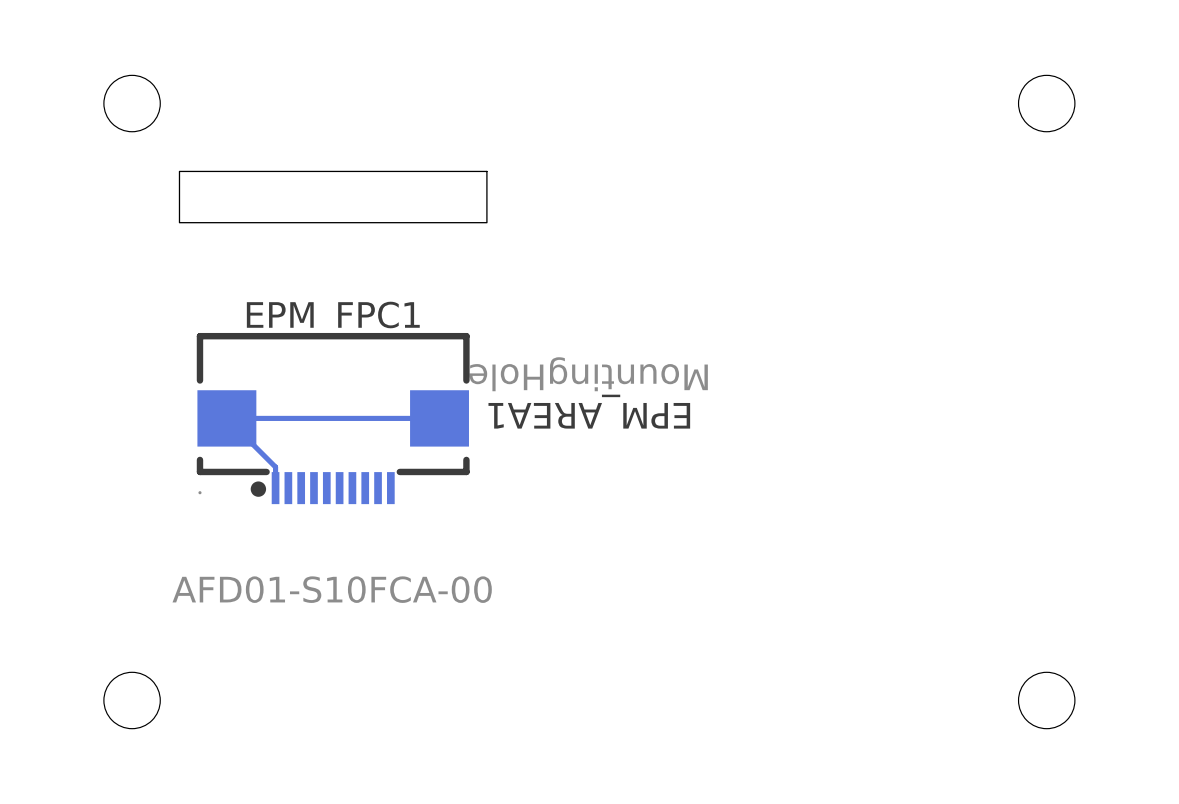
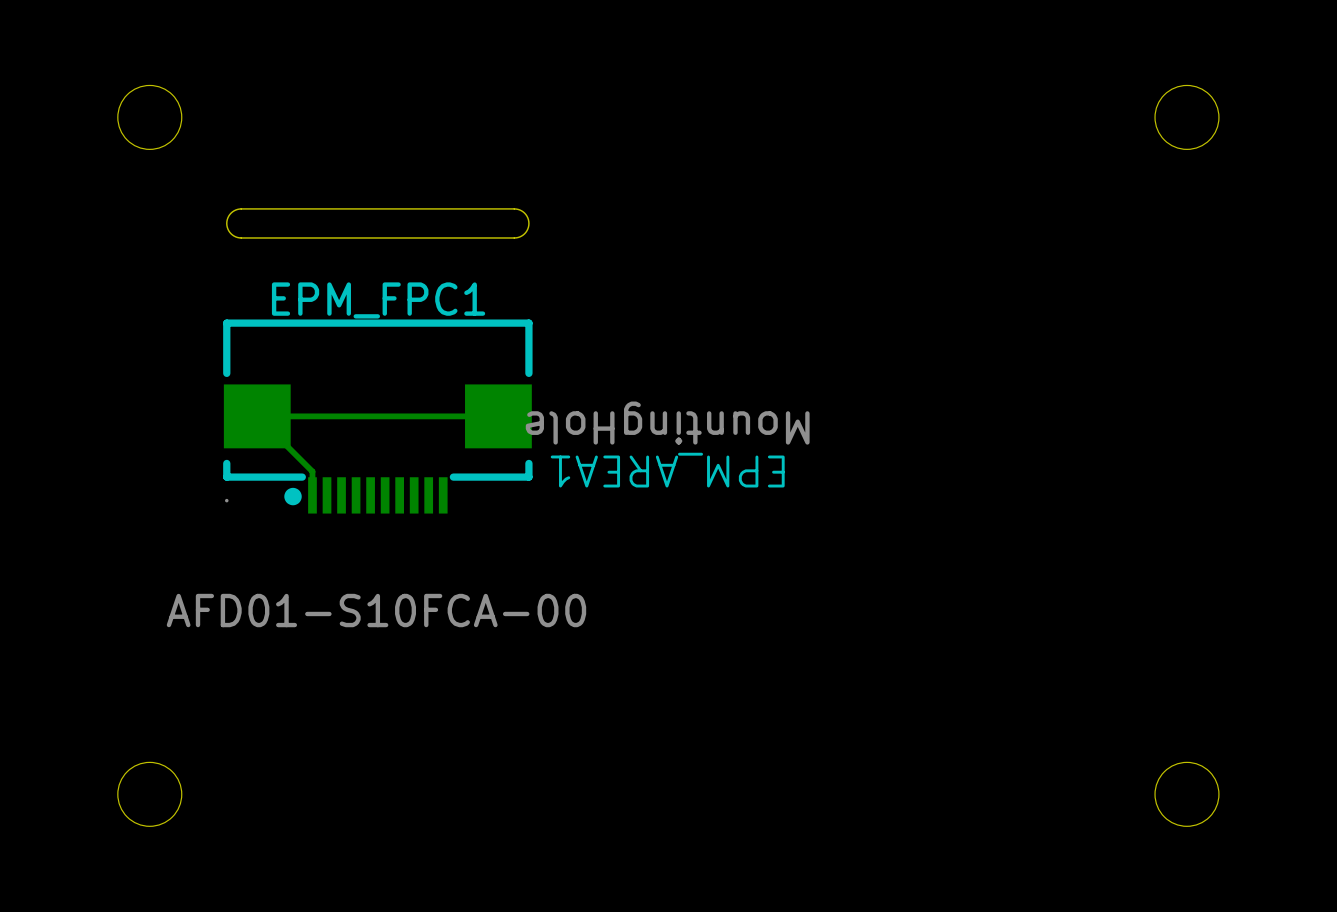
drawing shape: [178, 170, 488, 224] -> [226, 208, 530, 239]
EPM_FPC1 position: (333, 418) -> (377, 416)
bottom track: (439, 418) (226, 418) (275, 467) (275, 488) -> (498, 416) (257, 416) (312, 471) (312, 495)

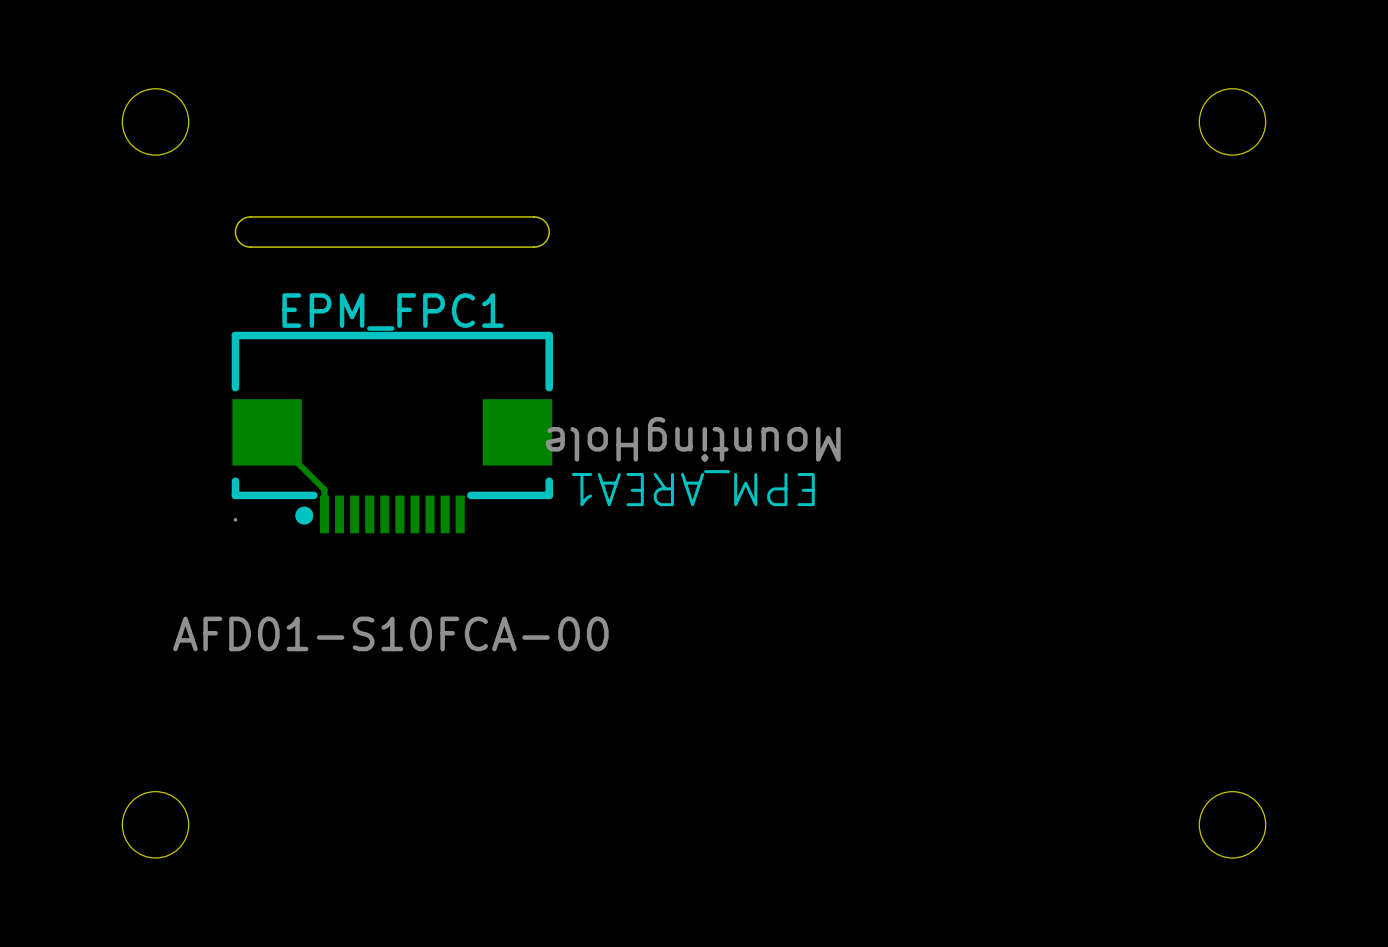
bottom track: (498, 416) (257, 416) -> none

